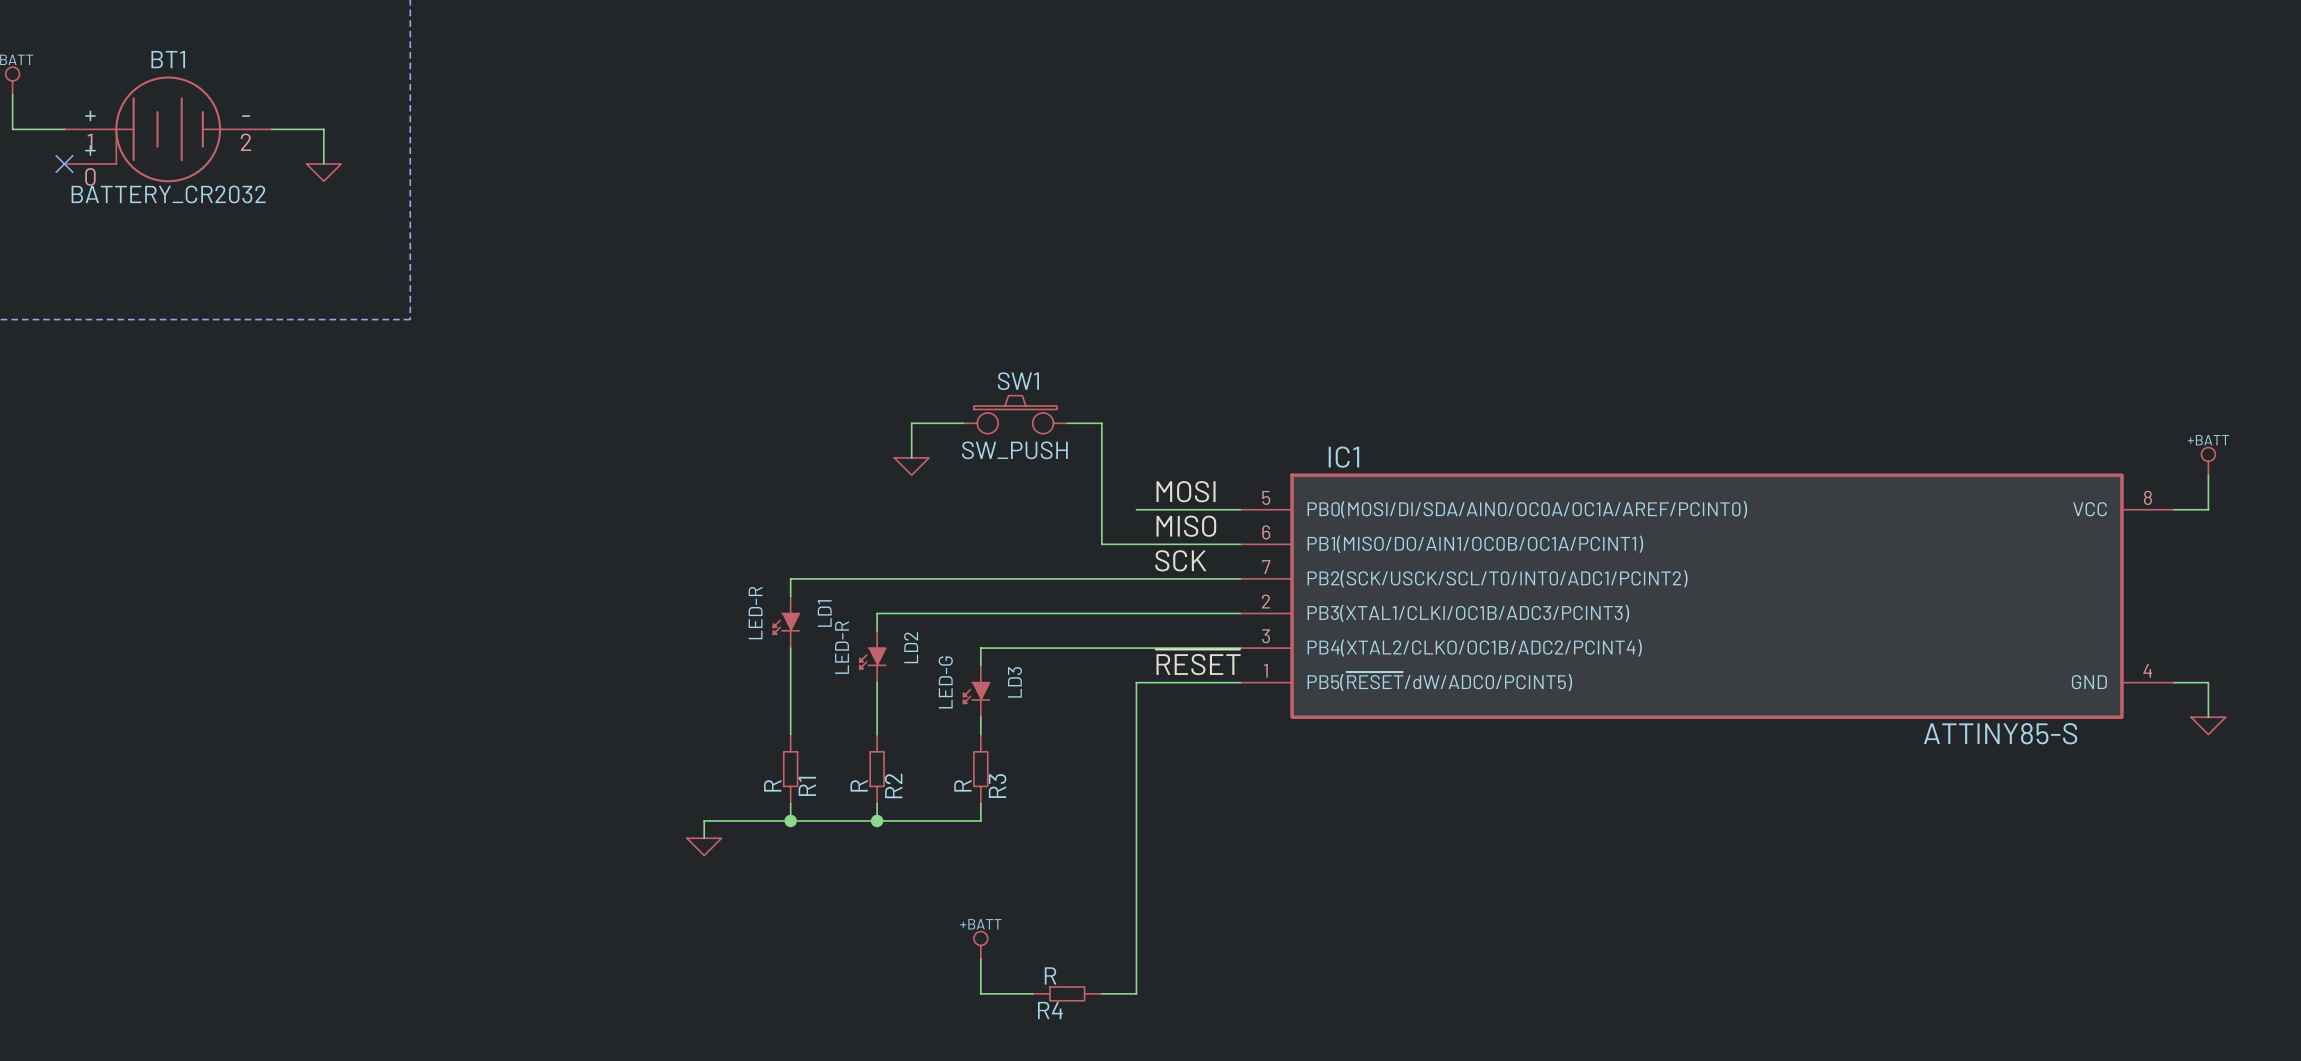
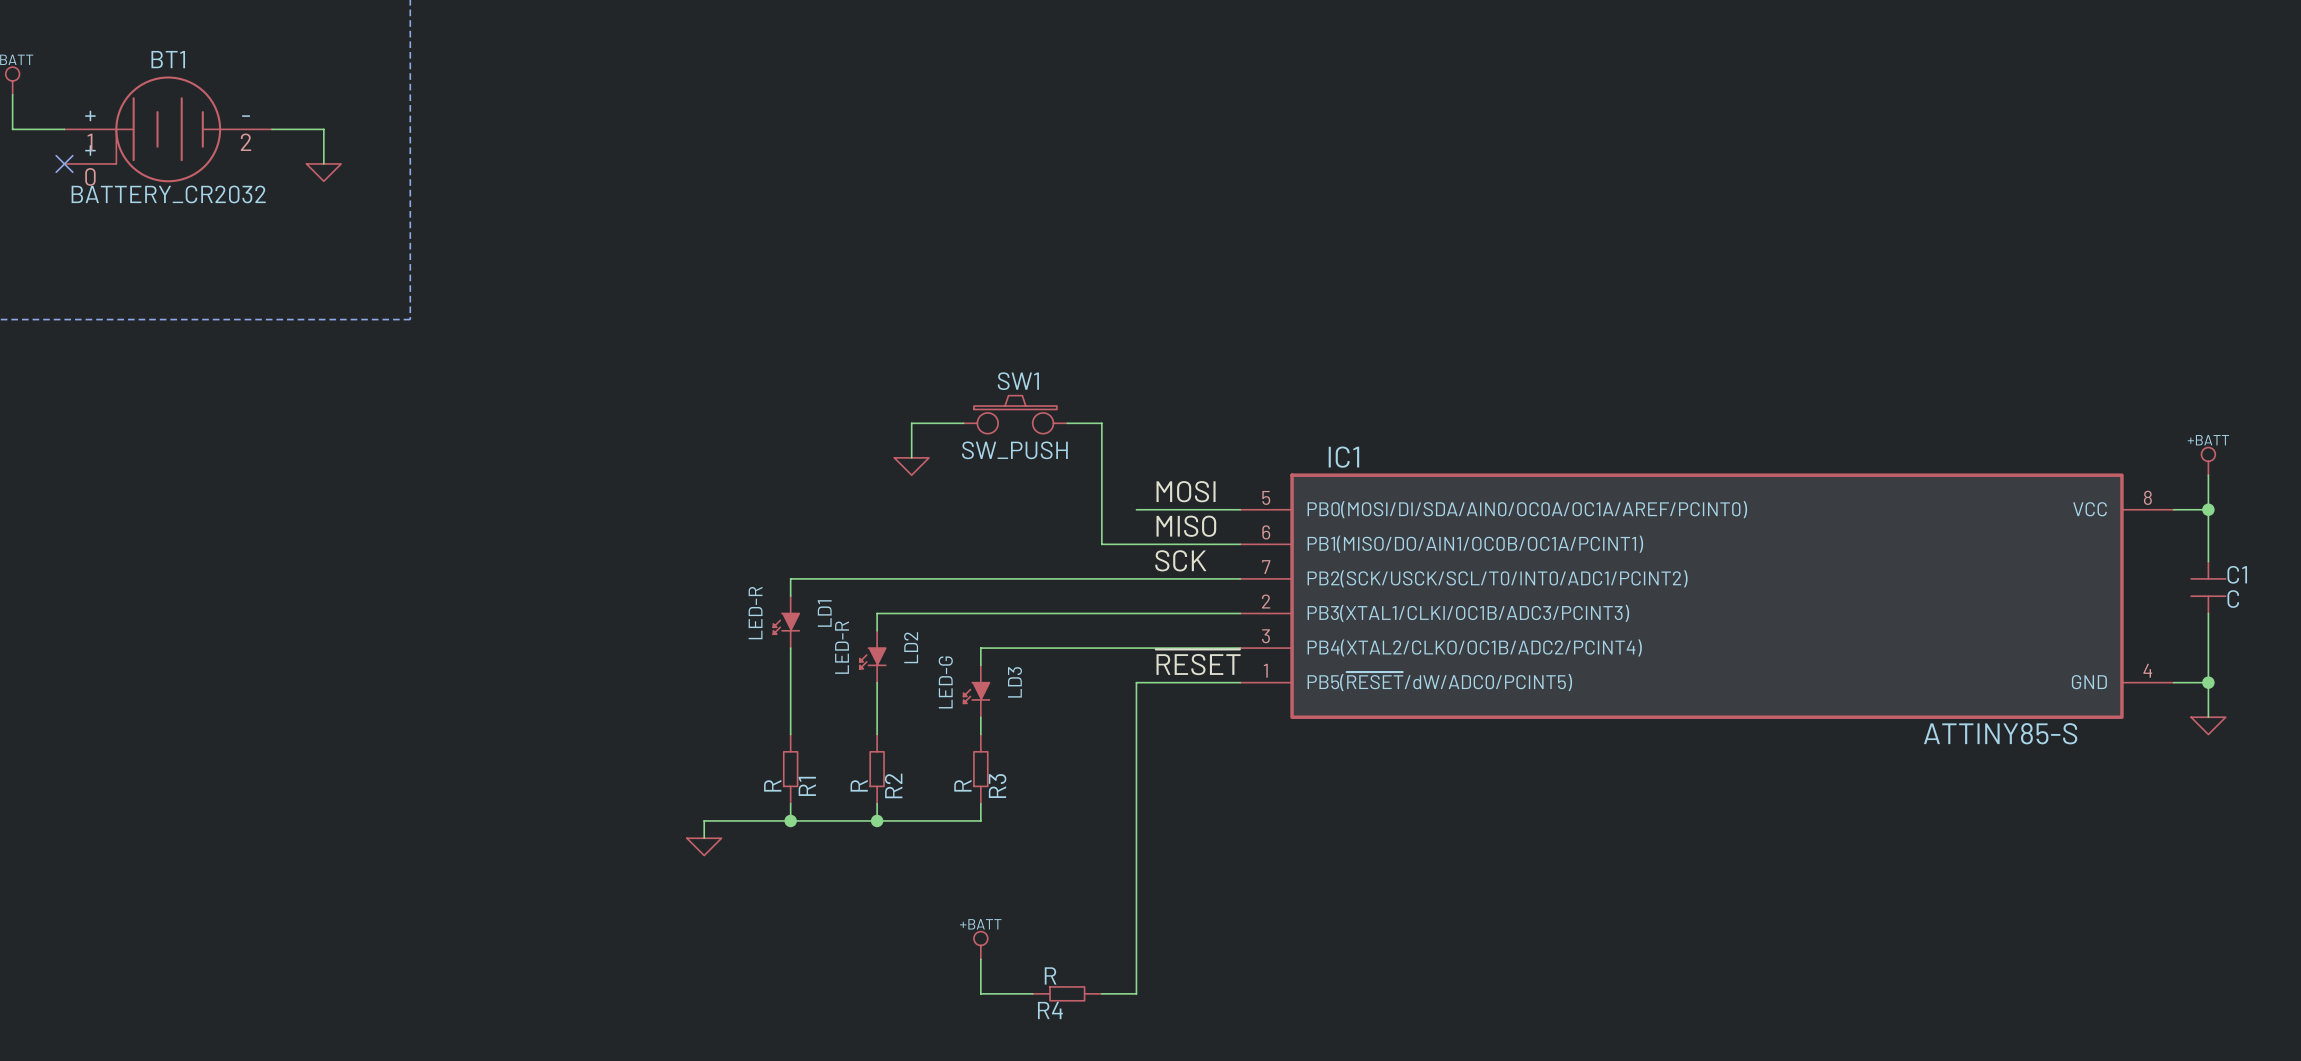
wire: none -> (2208, 509) (2208, 561)
junction: none -> (2208, 509)
C1: none -> C (2208, 587)
wire: none -> (2208, 613) (2208, 682)
junction: none -> (2208, 682)

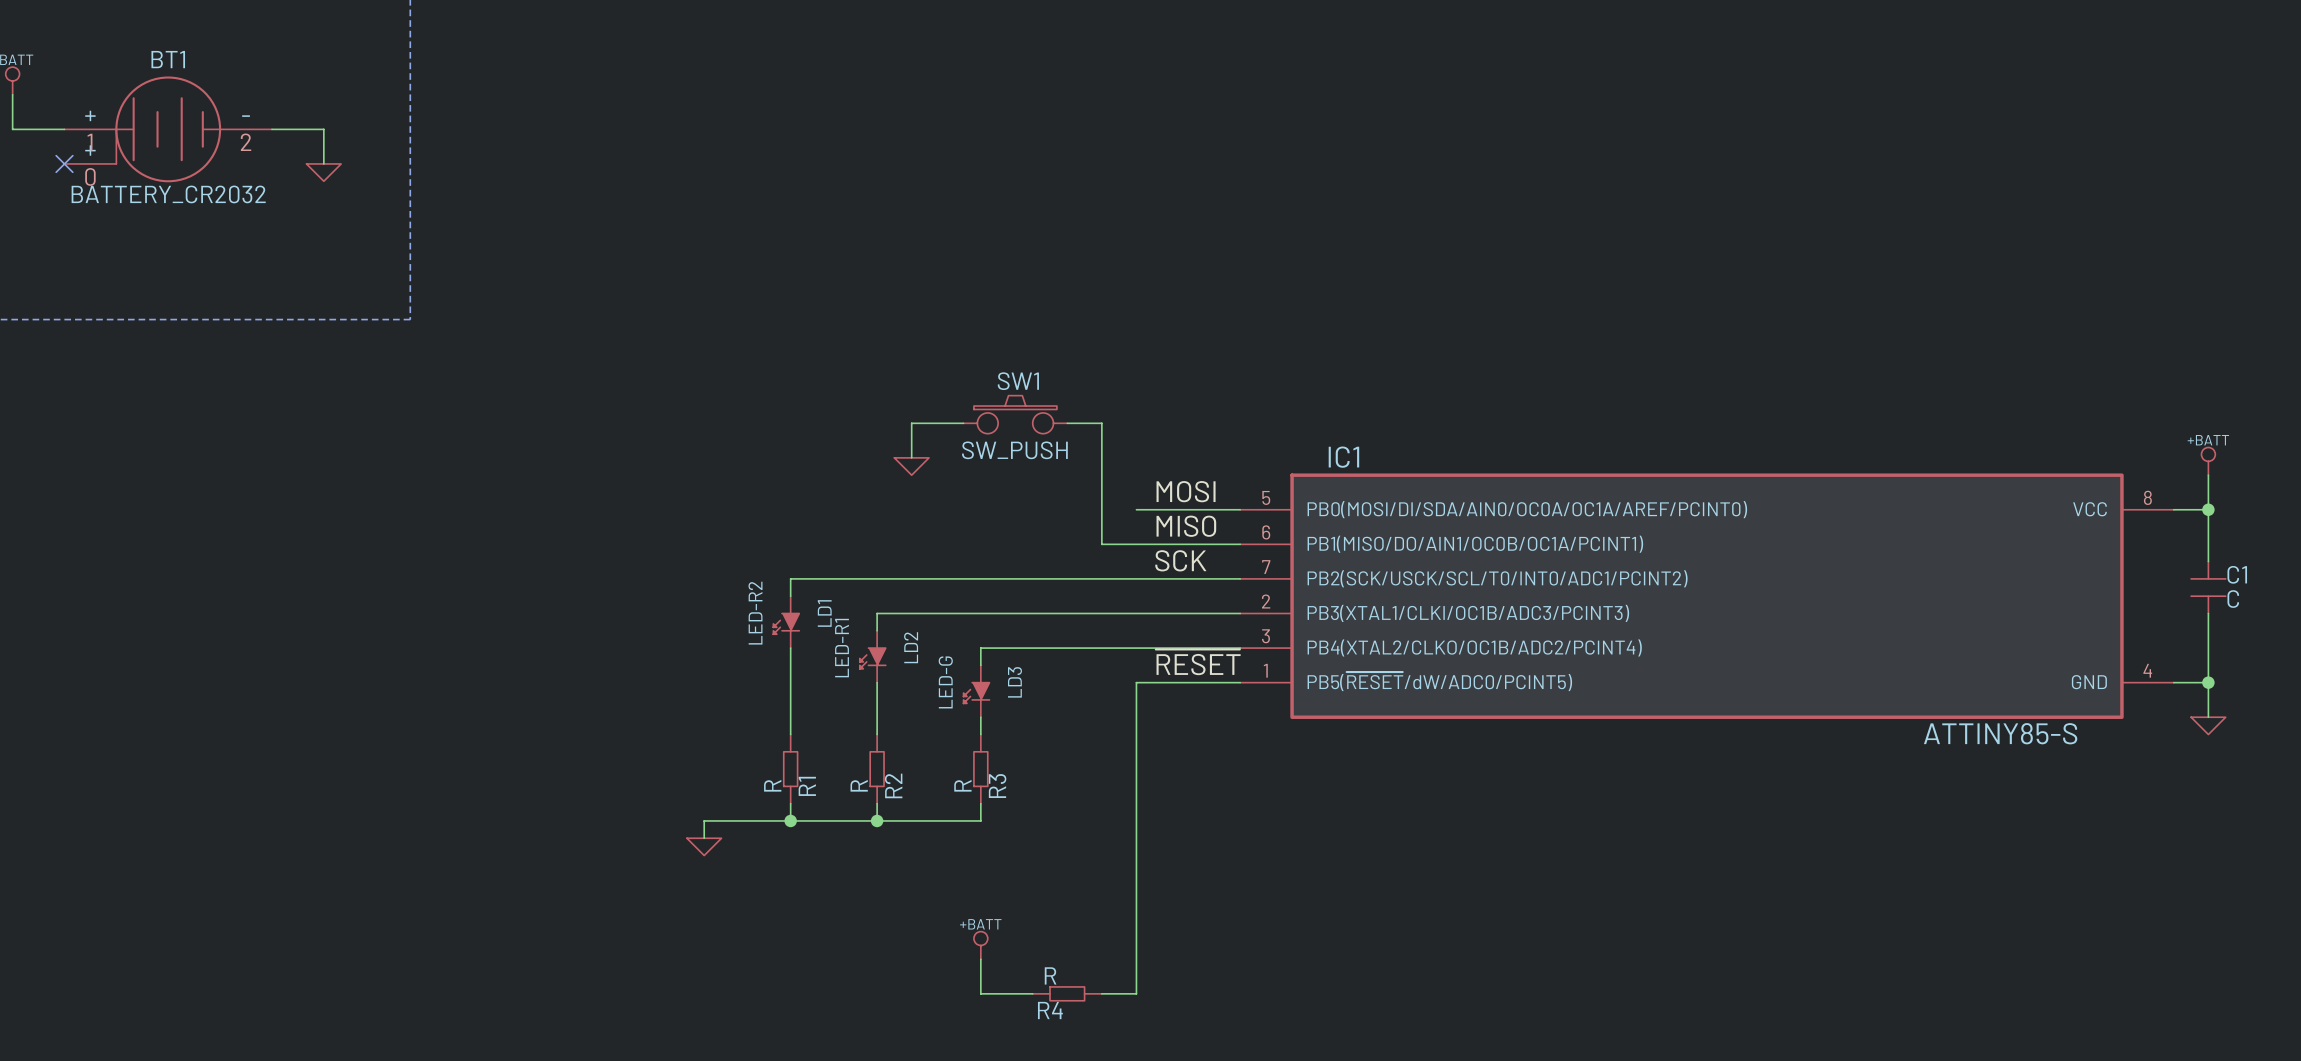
LD1 value: LED-R (755, 613) -> LED-R2 (755, 613)
LD2 value: LED-R (842, 647) -> LED-R1 (842, 648)

